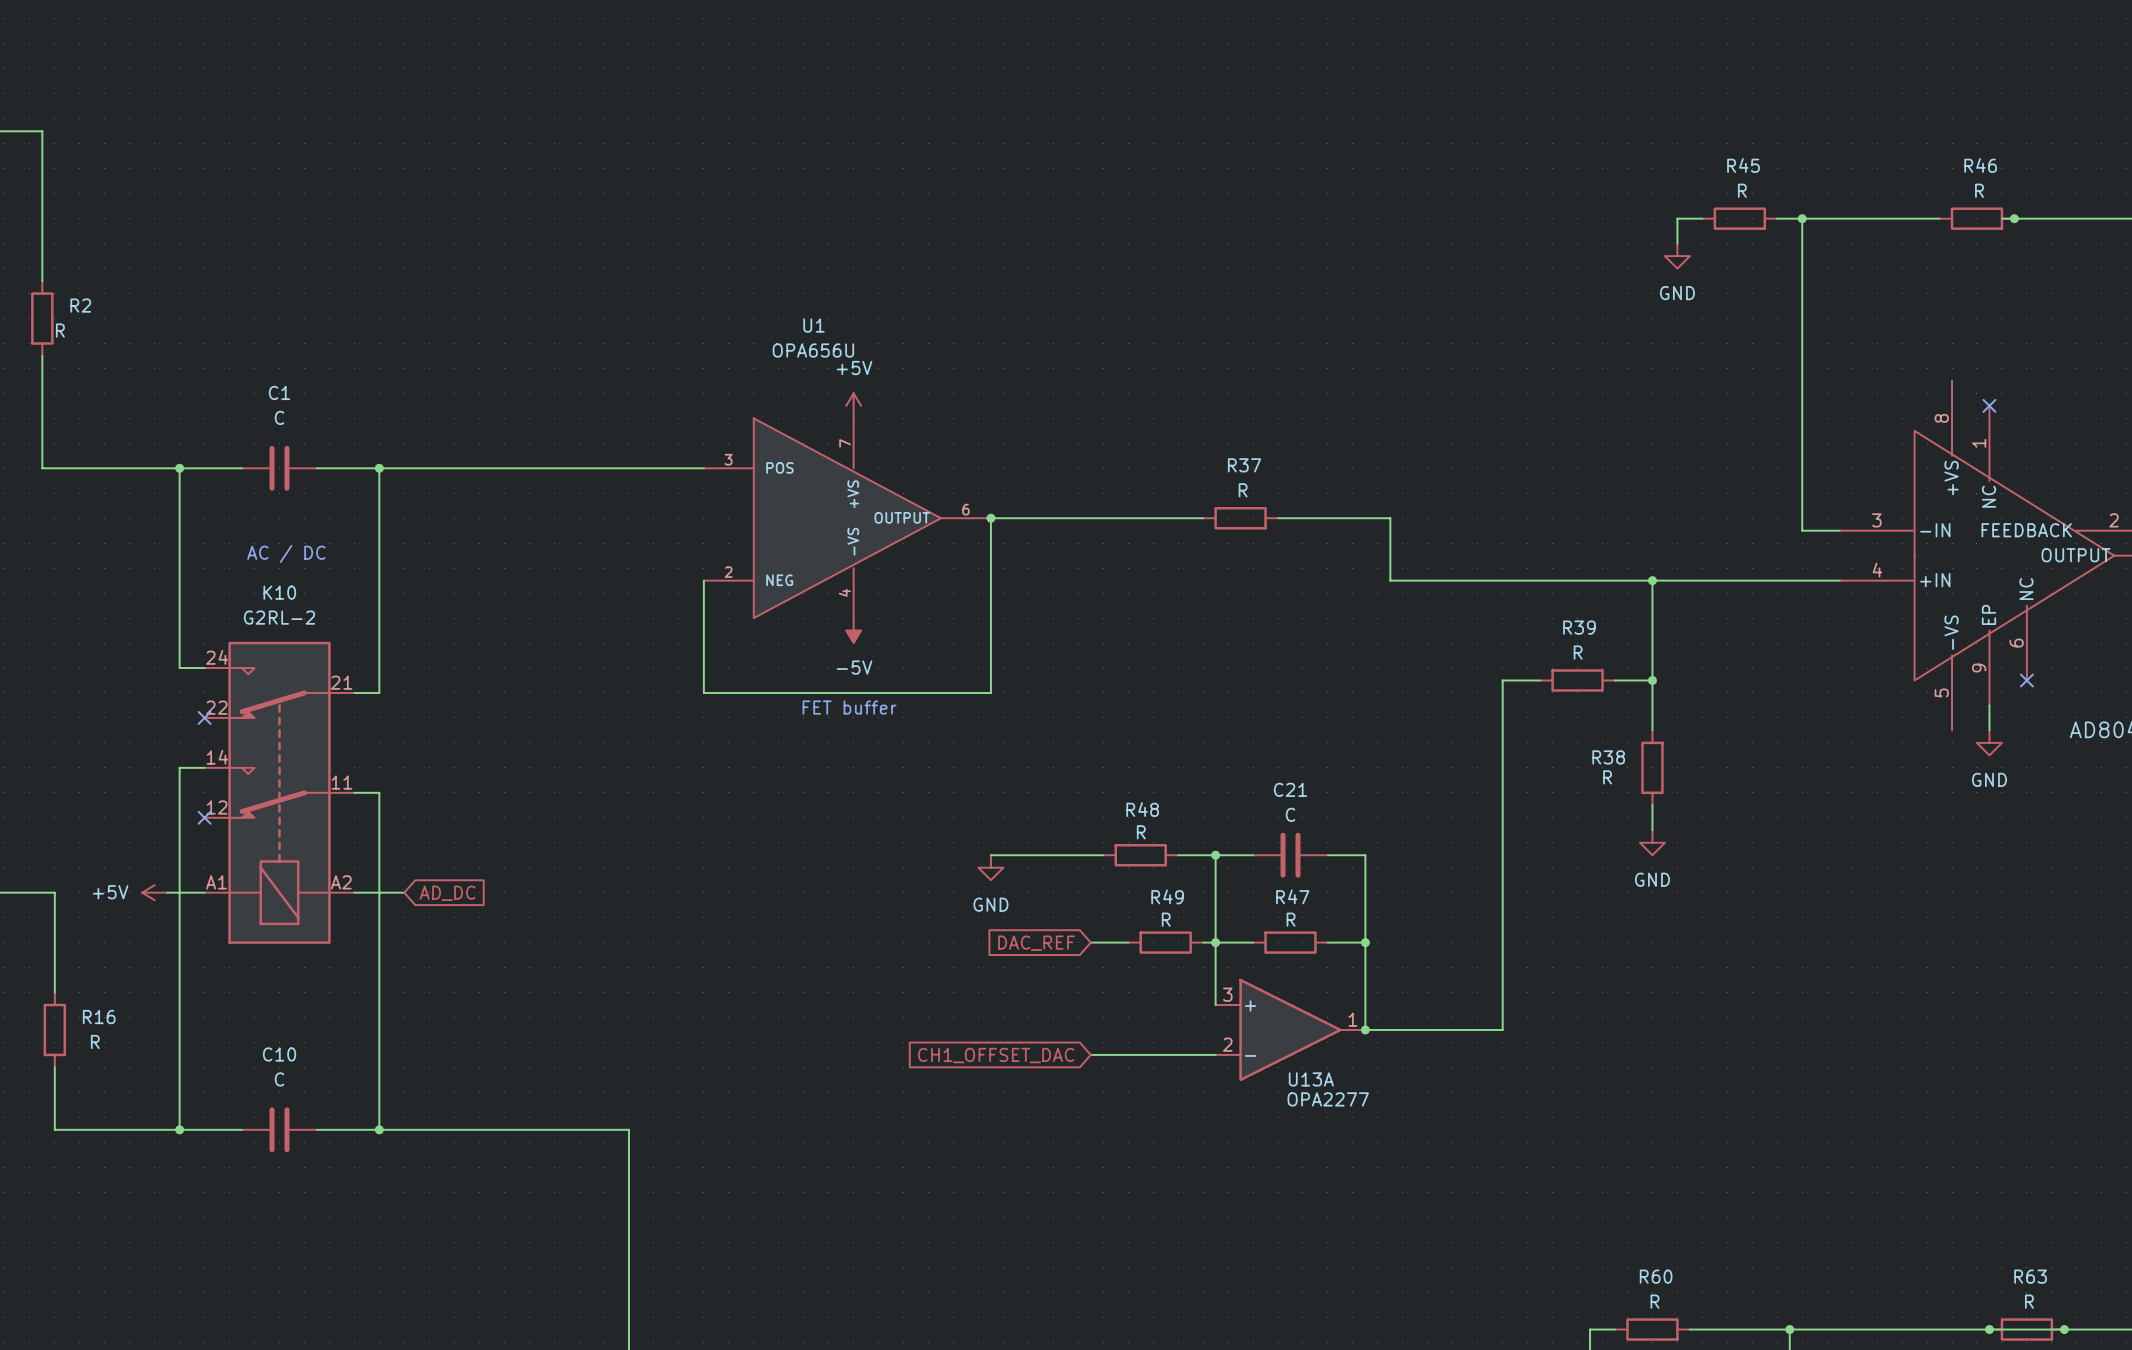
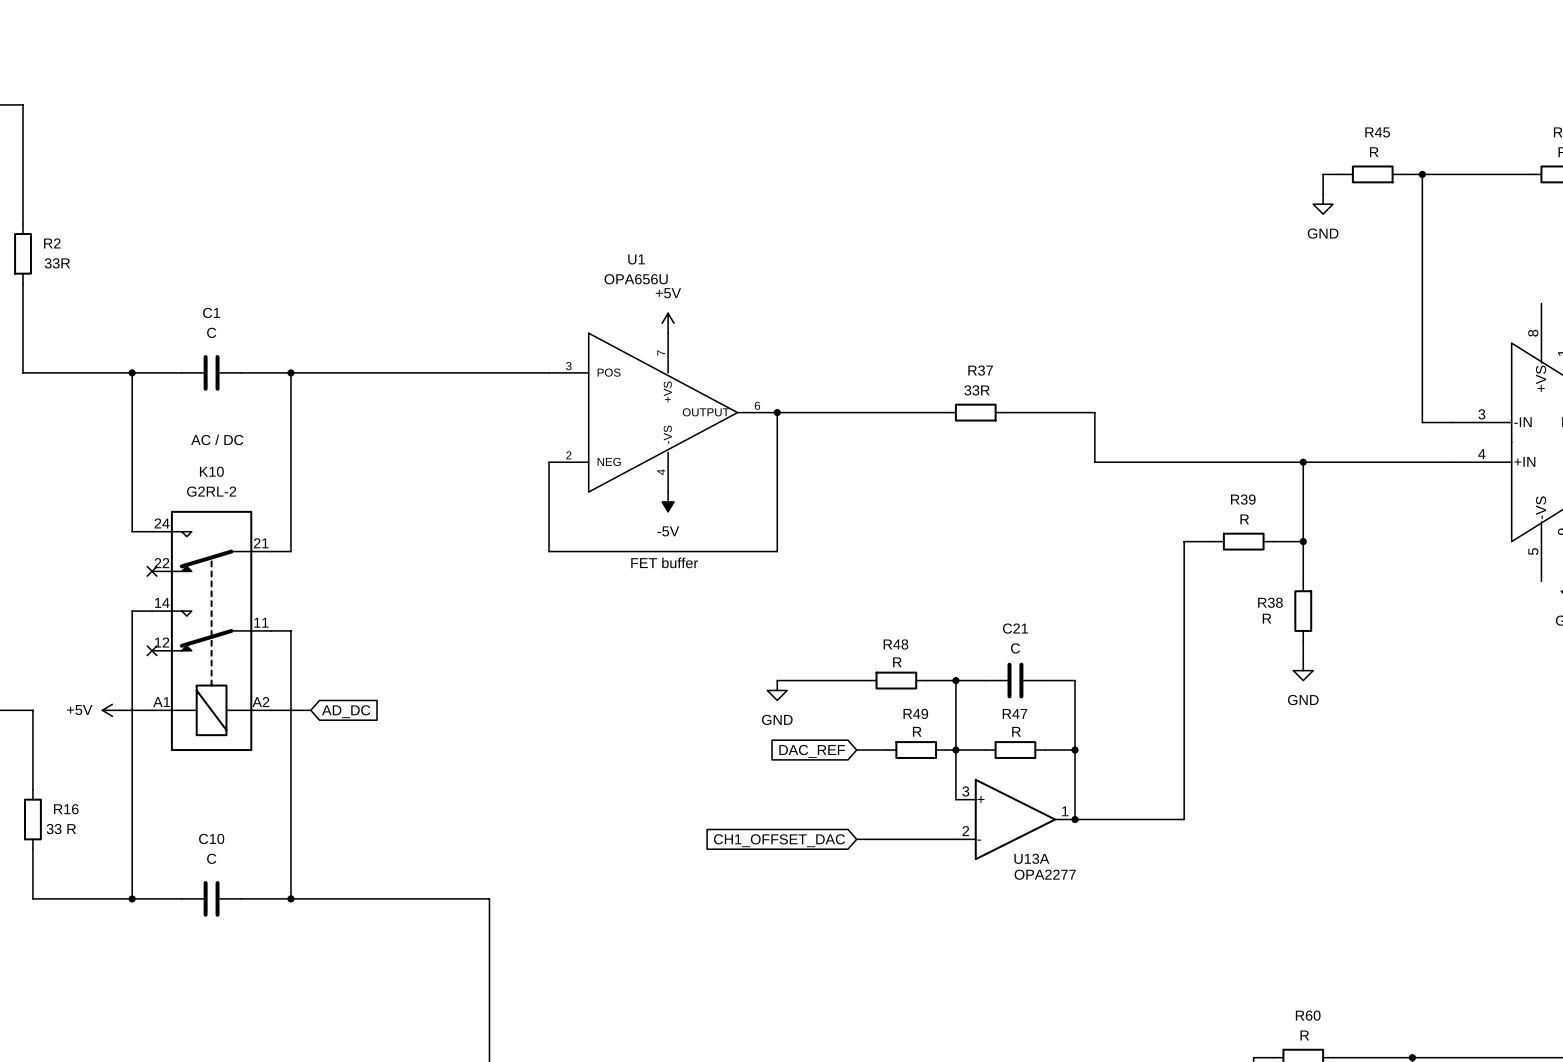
R2 value: R (60, 330) -> 33R (57, 263)
R37 value: R (1243, 490) -> 33R (977, 390)
R16 value: R (95, 1041) -> 33 R (61, 829)

